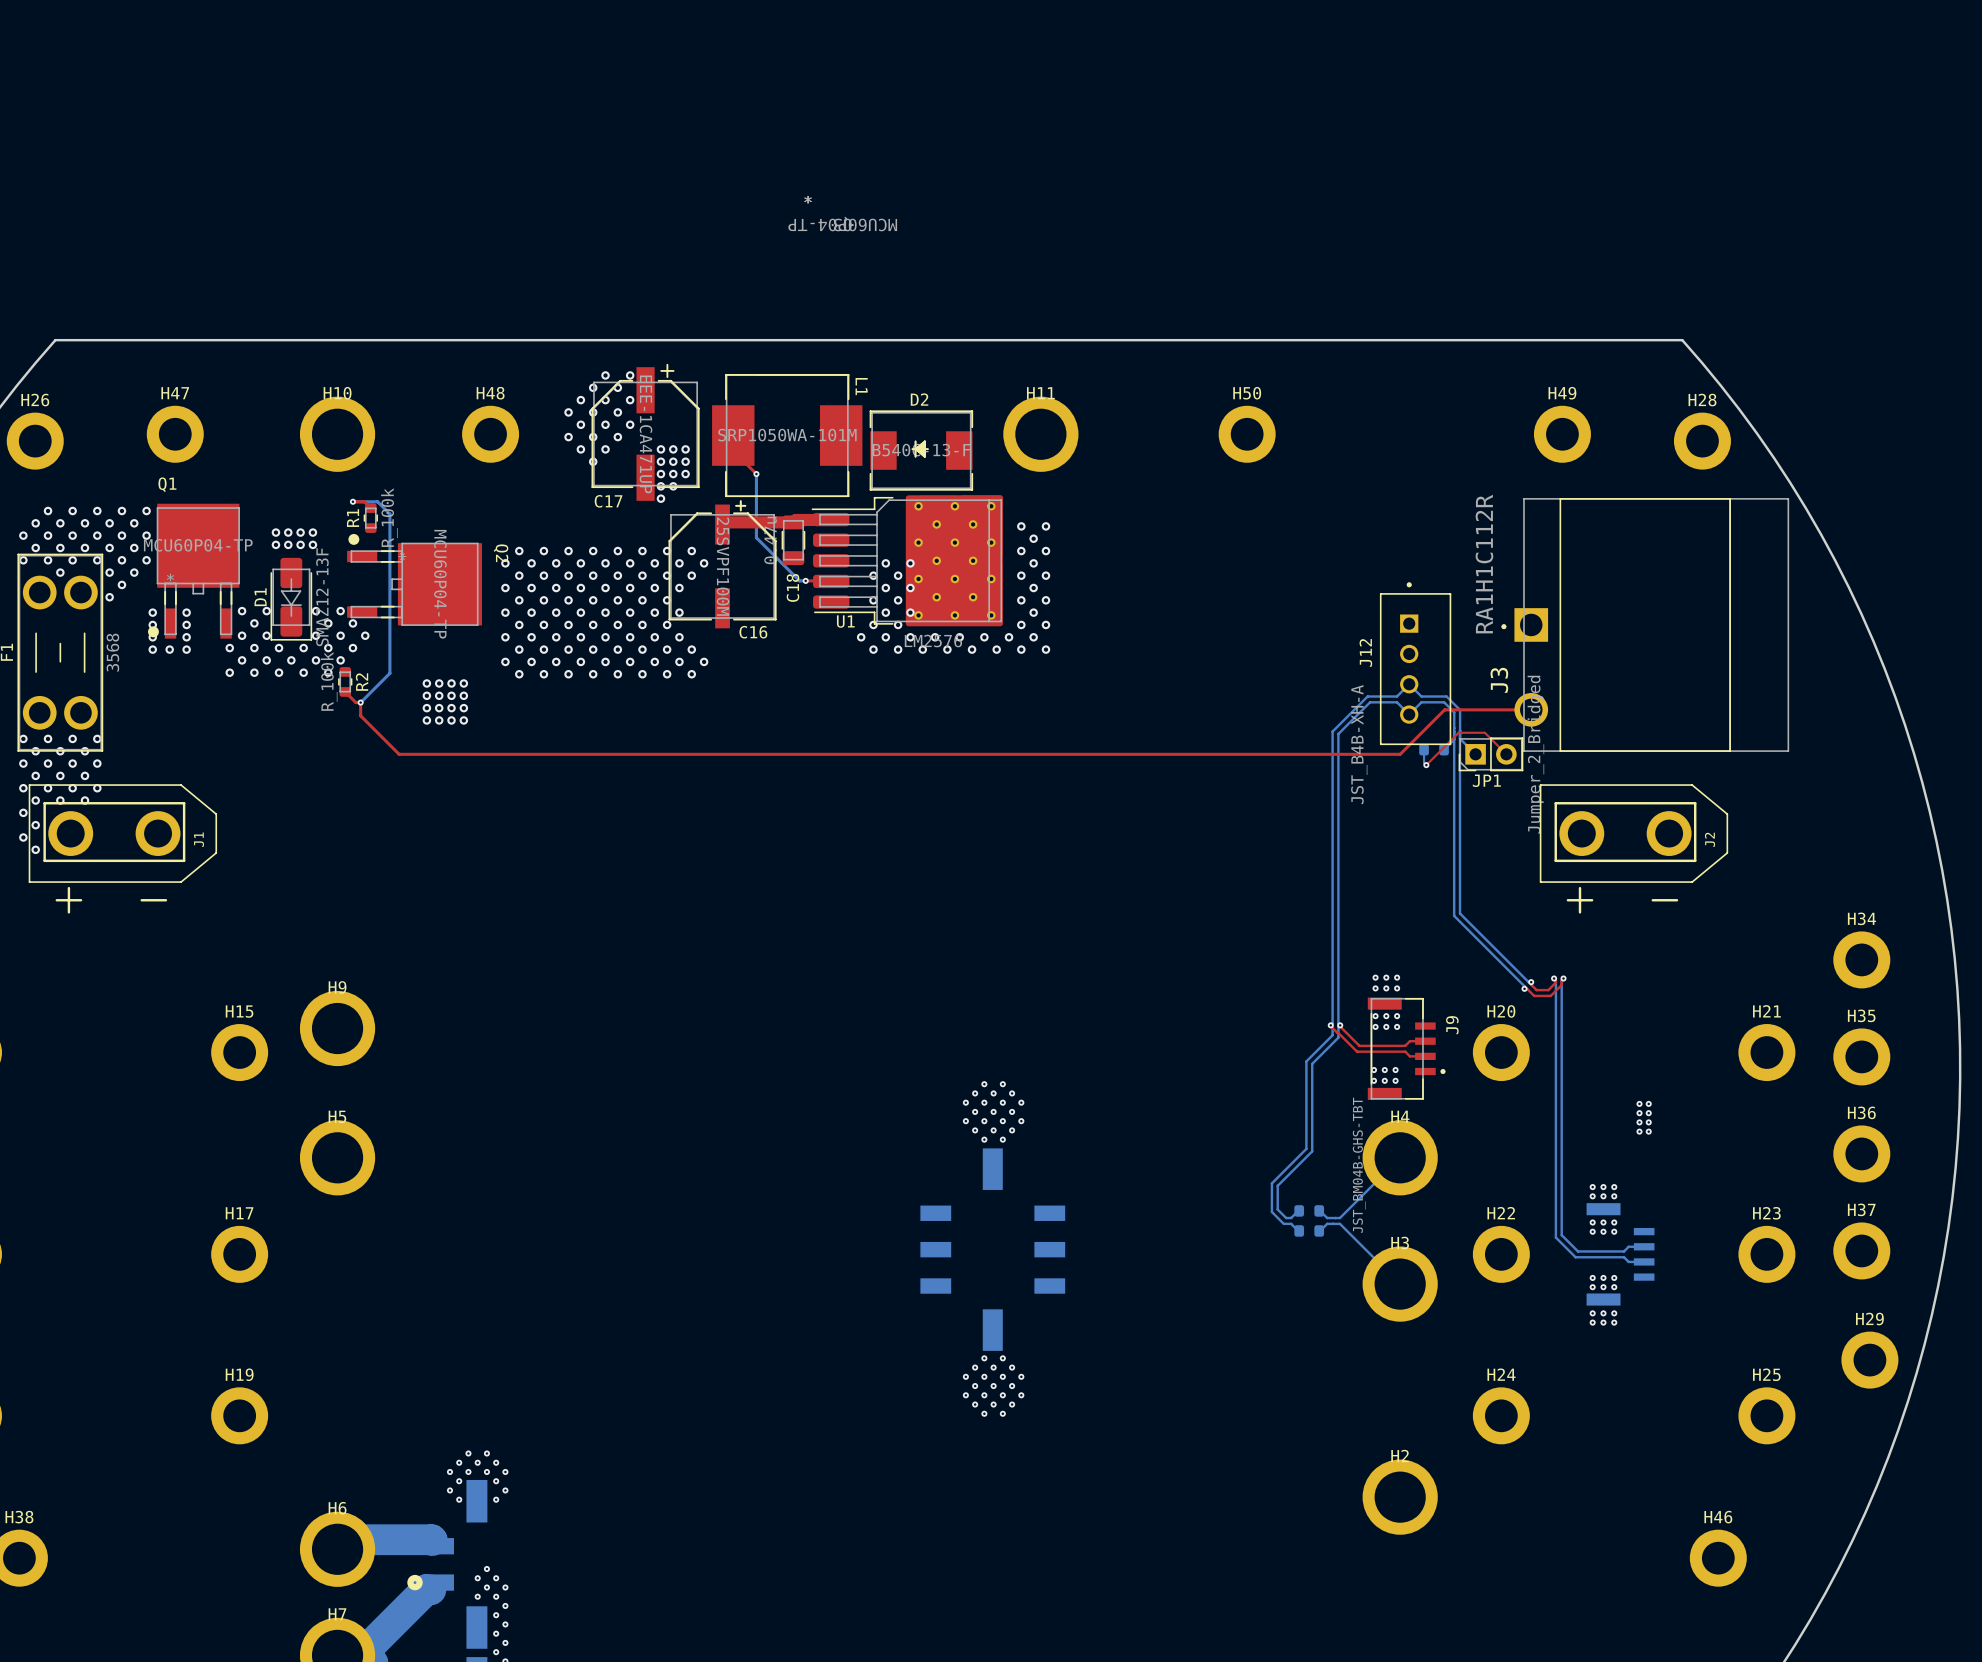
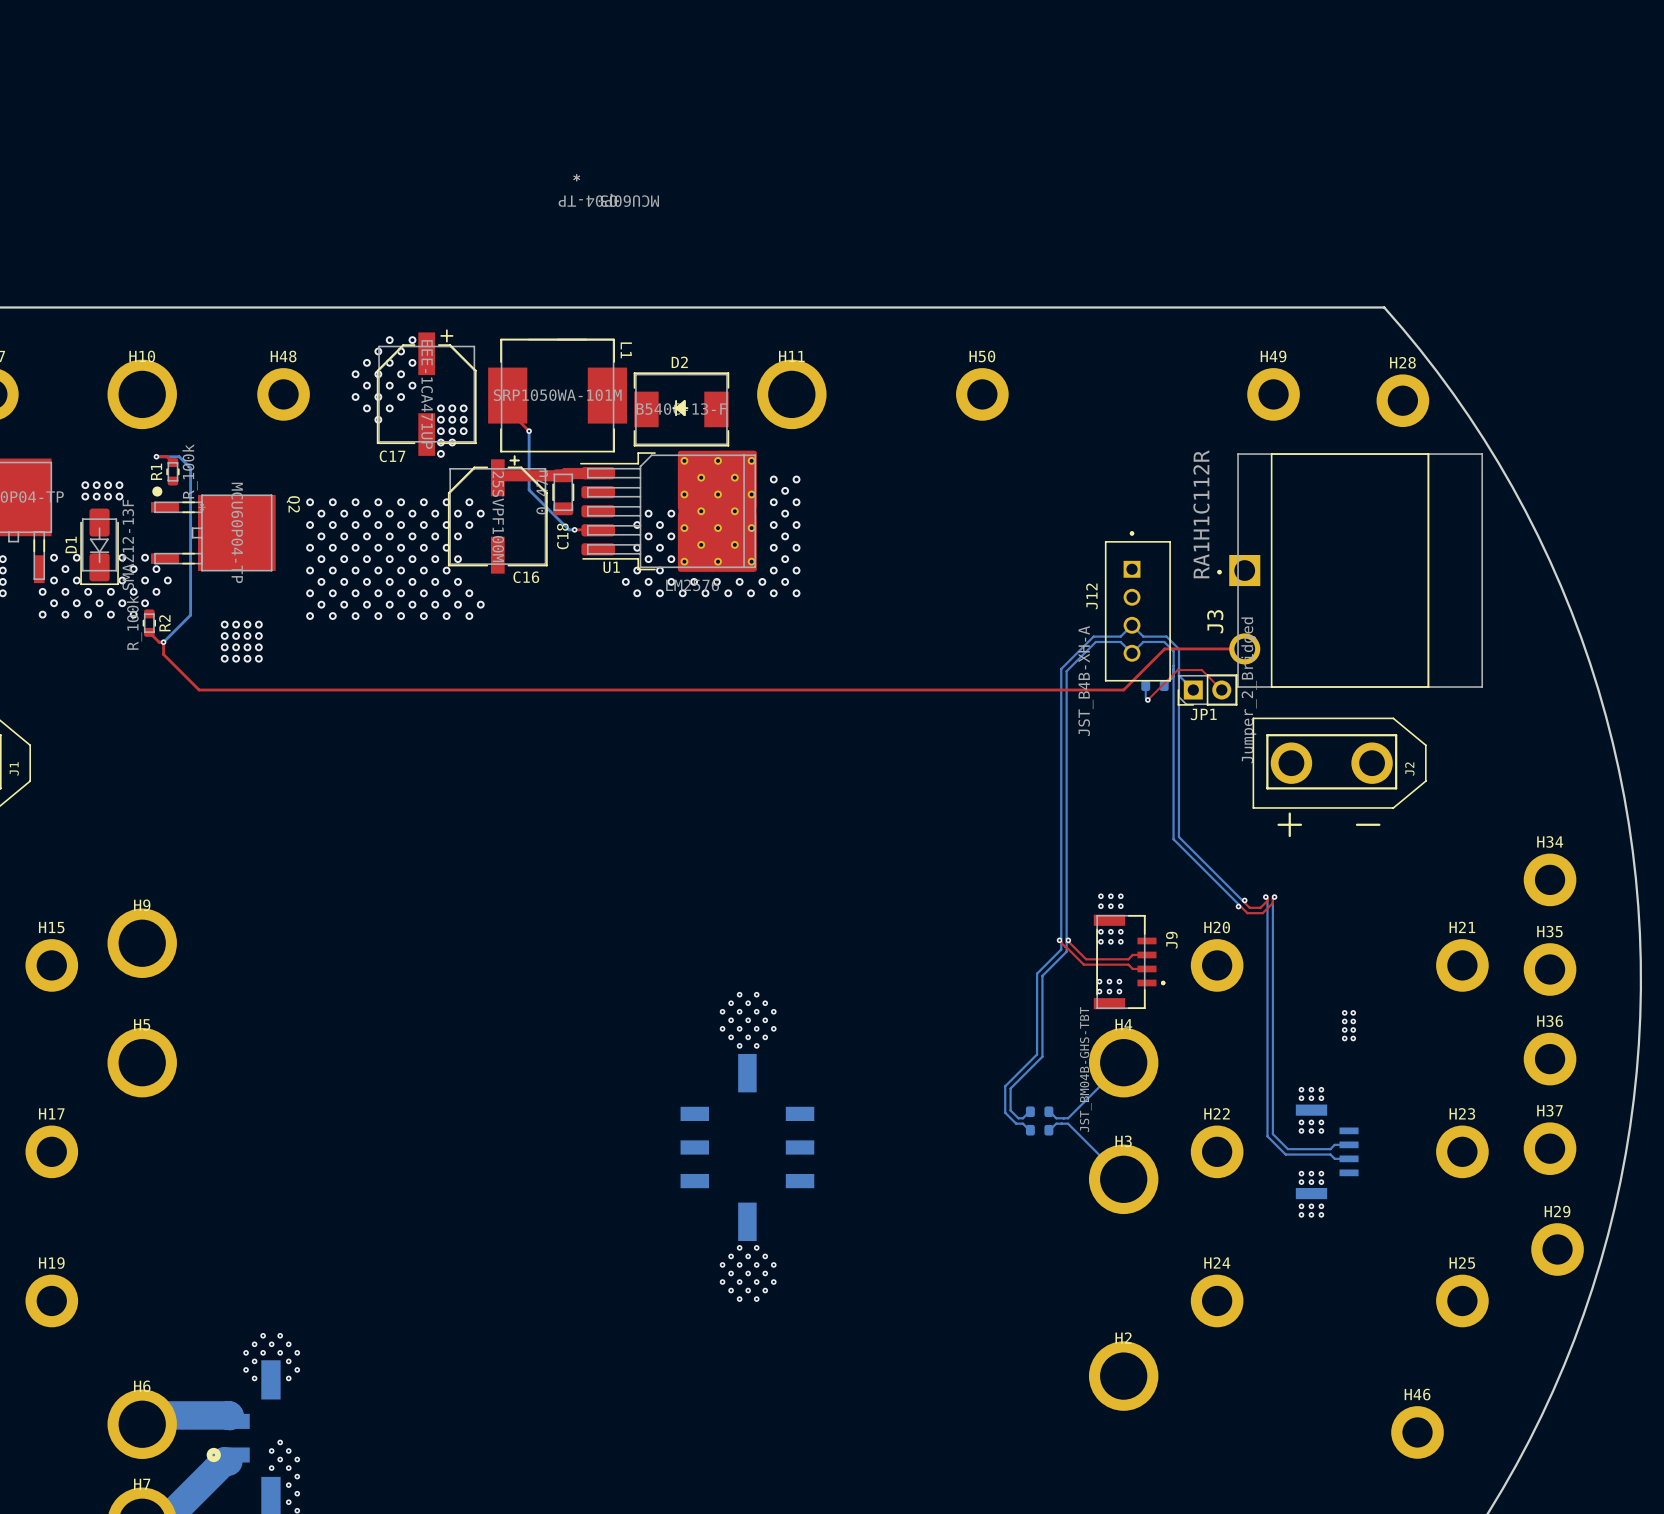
U1 footprint: [811, 495, 1003, 627] -> [580, 450, 757, 572]
via: (505, 563) -> none
via: (505, 588) -> none
via: (505, 612) -> none
via: (505, 637) -> none
via: (505, 661) -> none

